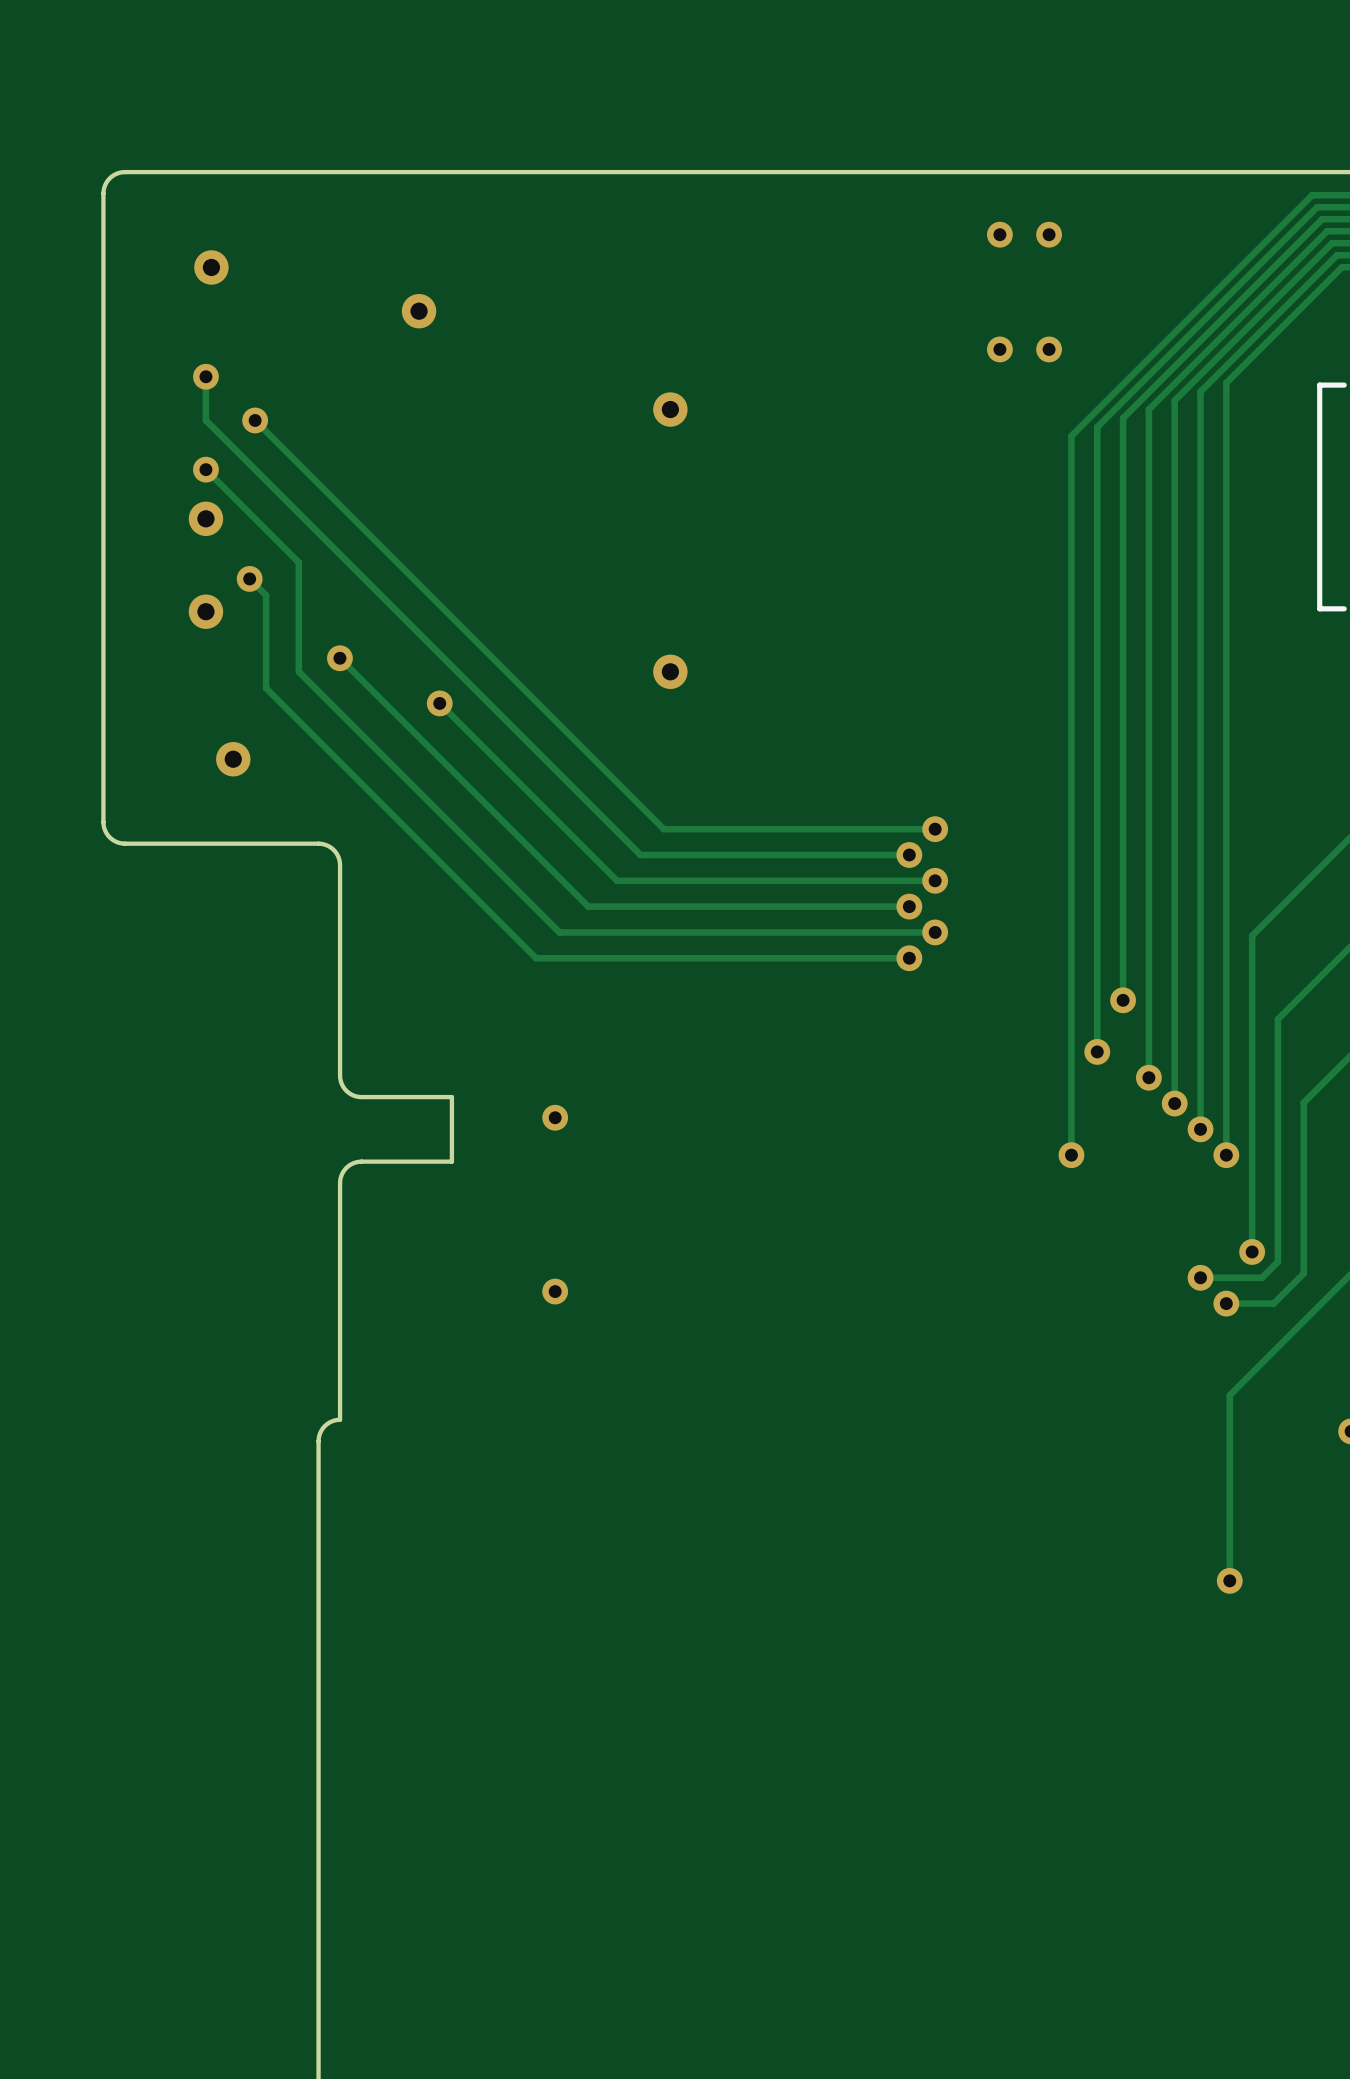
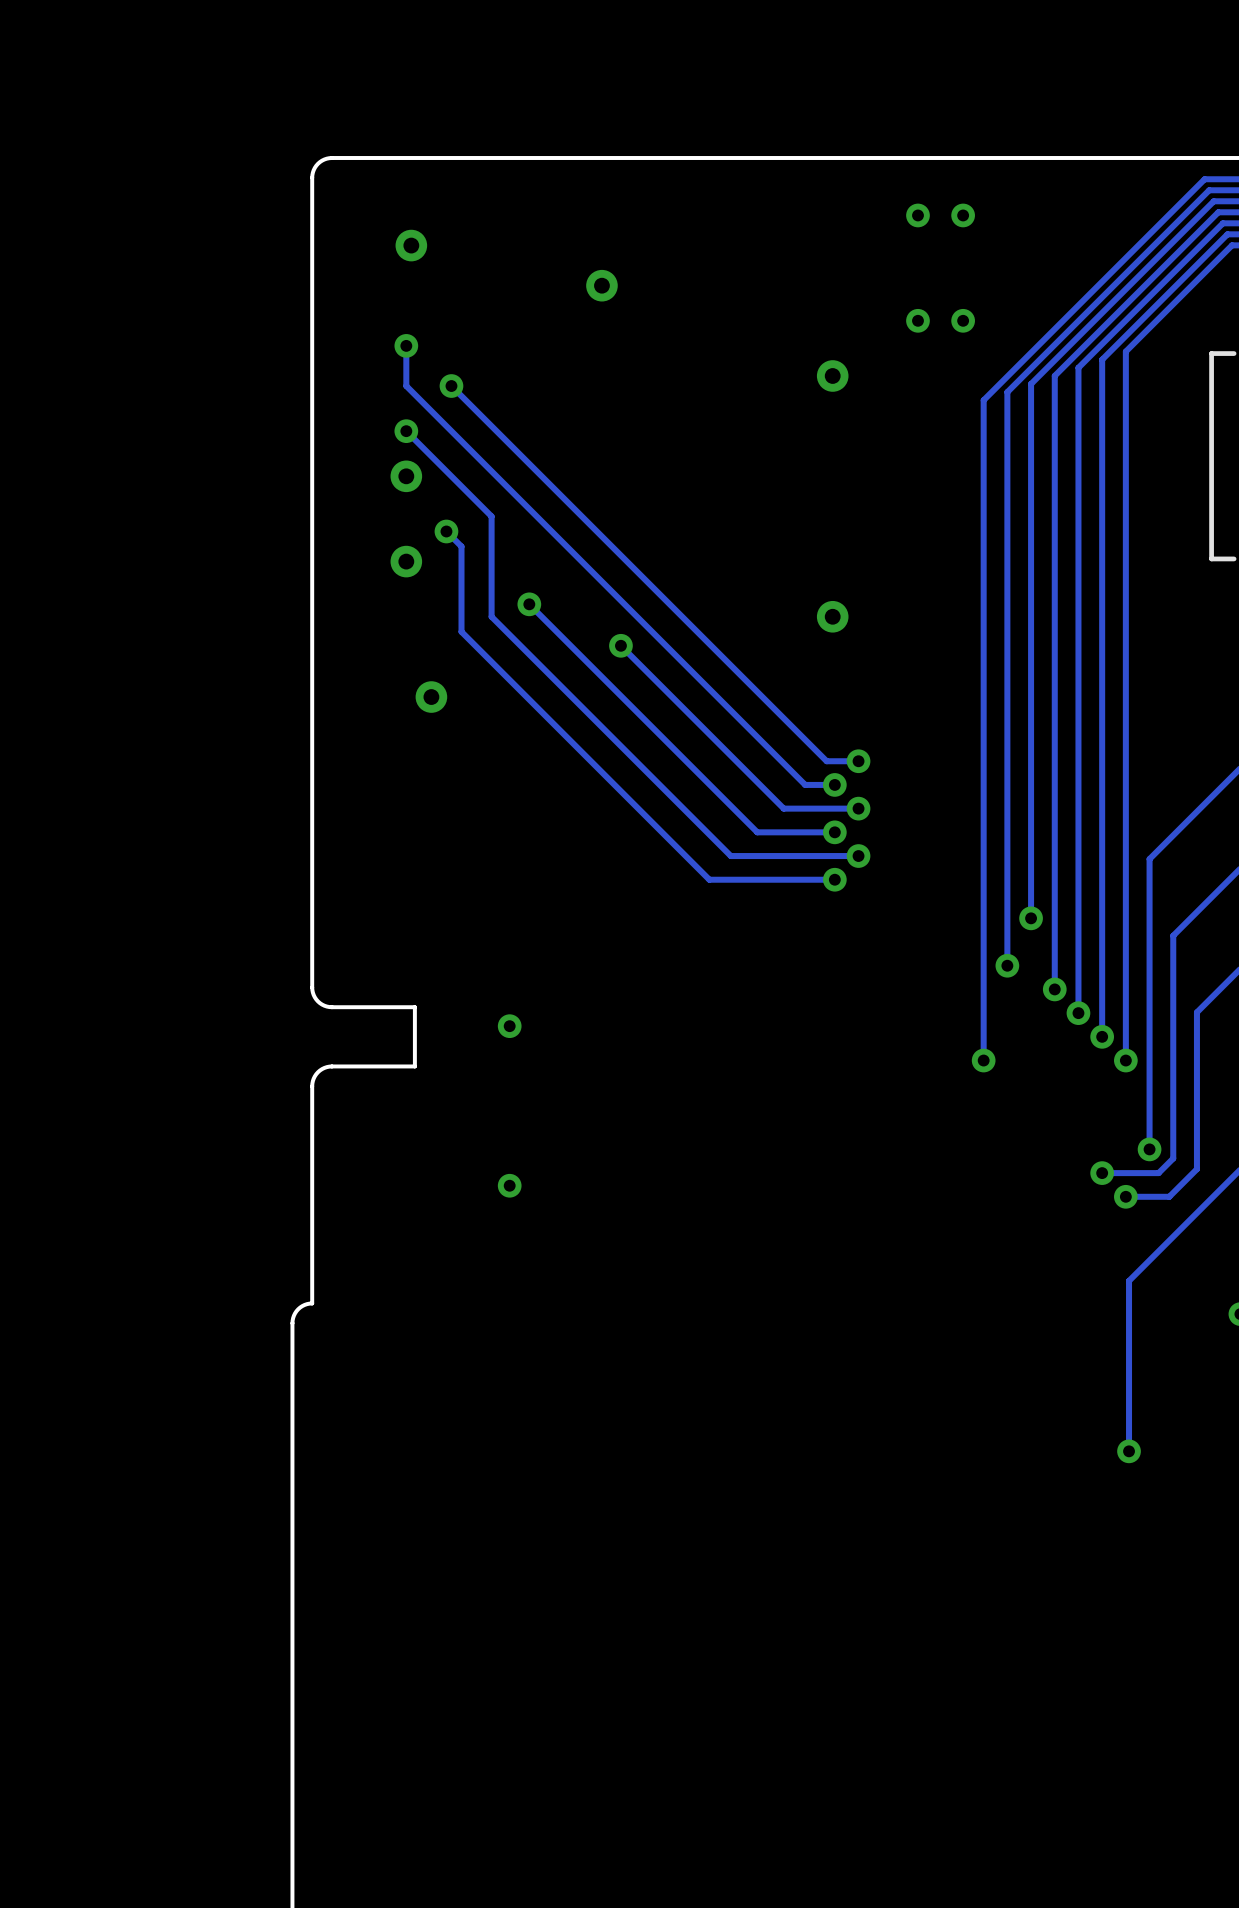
board edge: (361, 172) (122, 172) (114, 174) (107, 180) (103, 193) (103, 822) (105, 830) (114, 840) (124, 843) (321, 843) (333, 849) (338, 856) (340, 865) -> (331, 158) (324, 159) (317, 163) (313, 170) (312, 177) (312, 794)
via: (211, 267) -> none
via position: (419, 311) -> (411, 245)
track: (205, 376) (205, 420) (640, 854) (877, 854) -> (406, 345) (406, 386) (805, 784)
via: (205, 376) -> none
via: none -> (406, 345)
via position: (670, 409) -> (601, 285)
via: none -> (832, 375)
track: (255, 420) (663, 829) (900, 829) -> (451, 386) (826, 761)
via: (255, 420) -> none
via: none -> (451, 386)
track: (205, 469) (298, 562) (298, 671) (559, 932) (796, 932) -> (406, 431) (491, 516) (491, 616) (730, 856)
via: (205, 469) -> none
via: none -> (406, 431)
via: (205, 518) -> none
via: none -> (406, 476)
track: (249, 578) (266, 595) (266, 688) (536, 958) (772, 958) -> (446, 531) (461, 546) (461, 631) (709, 879)
via: (249, 578) -> none
via: none -> (446, 531)
via: (205, 611) -> none
via: none -> (406, 561)
track: (339, 658) (588, 906) (824, 906) -> (529, 604) (757, 832)
via: (339, 658) -> none
via: none -> (529, 604)
via: (670, 671) -> none
via: none -> (832, 616)
track: (439, 703) (617, 880) (853, 880) -> (620, 645) (783, 808)
via: (439, 703) -> none
via: none -> (620, 645)
via: (233, 759) -> none
via: none -> (431, 697)

